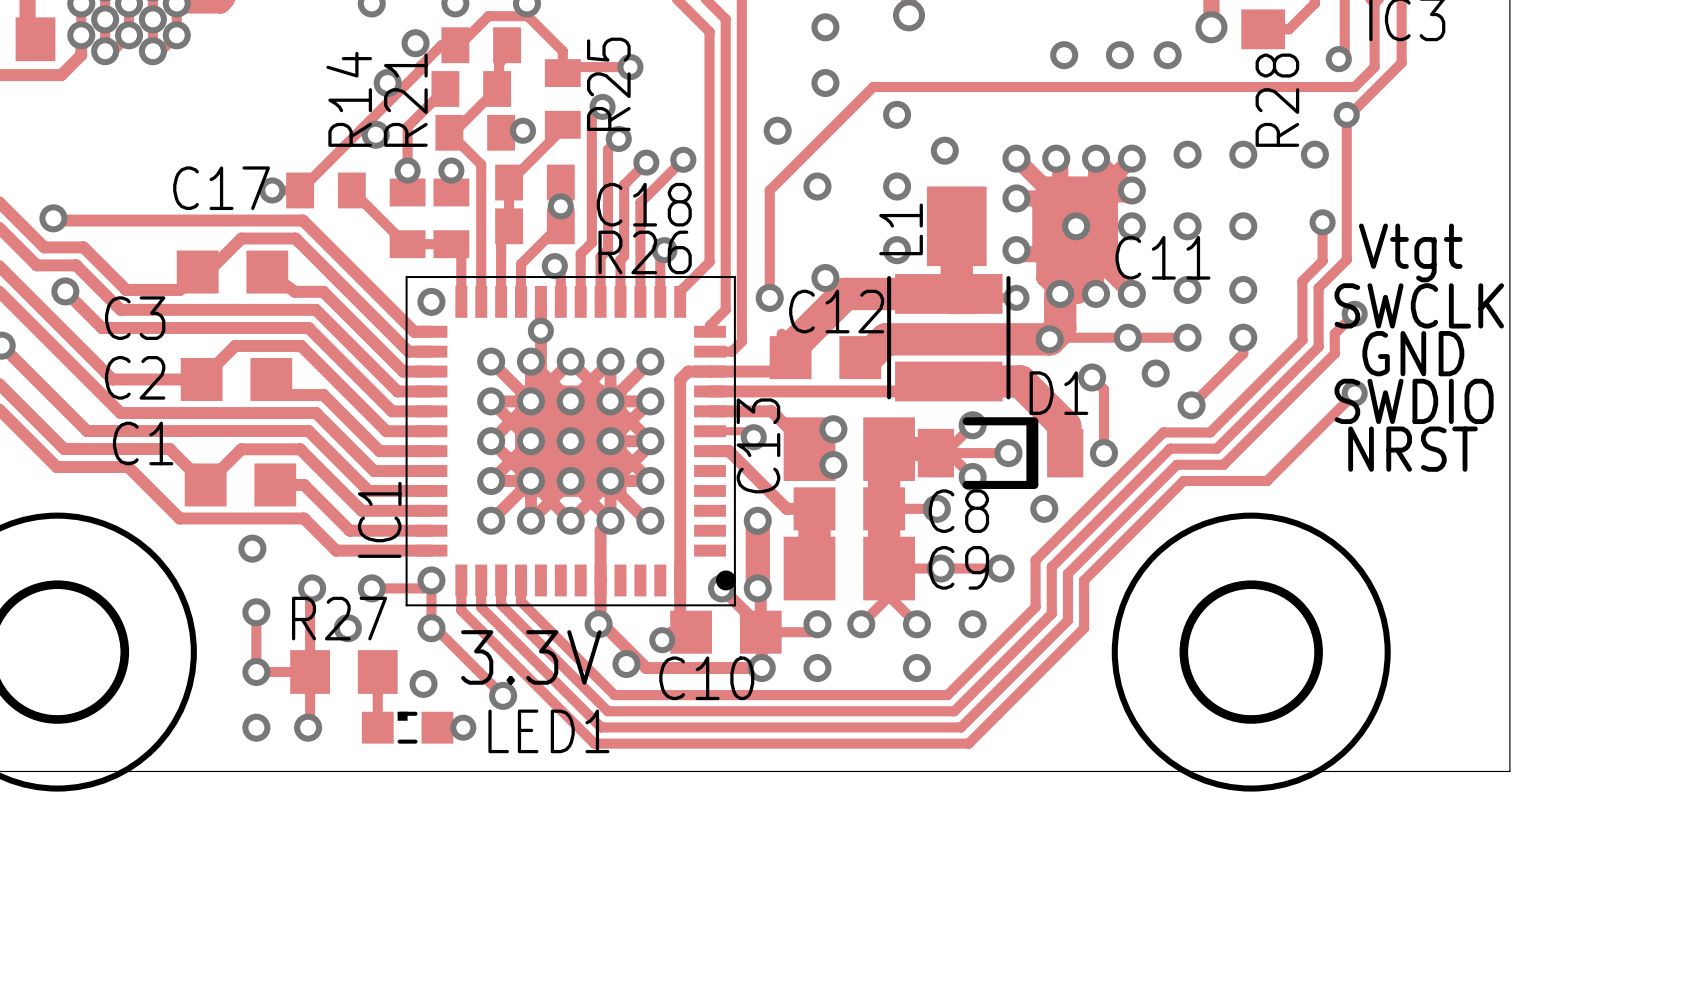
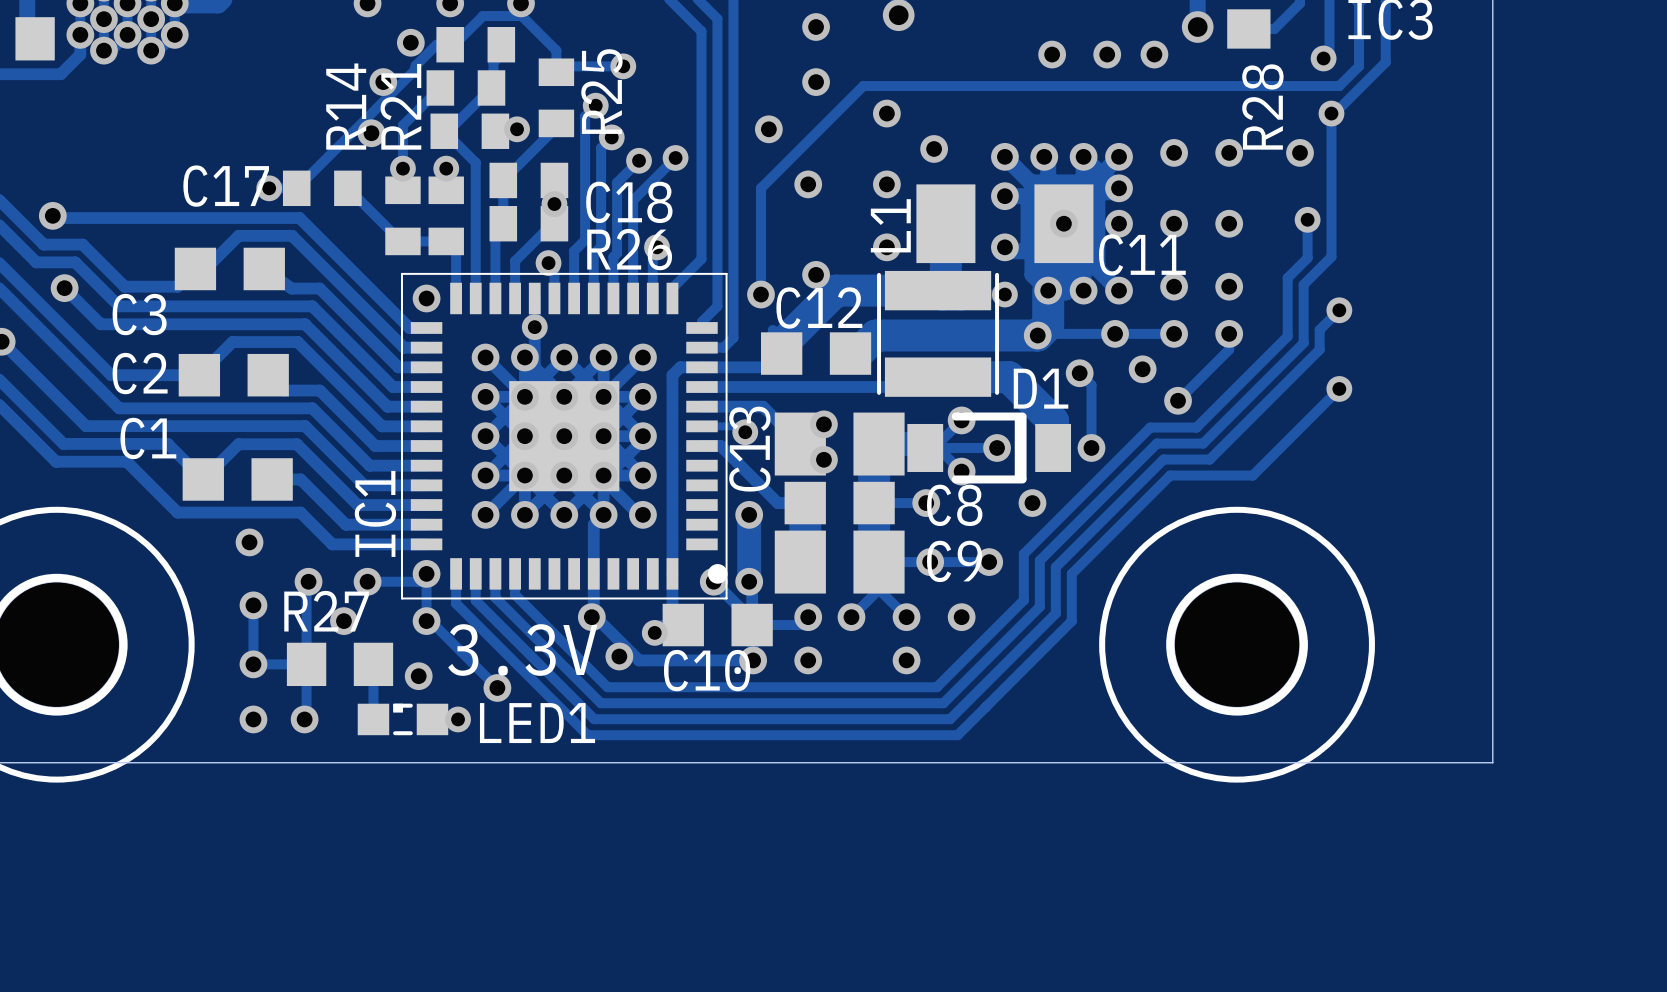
text: Vtgt (1410, 252) -> none
text: SWCLK (1419, 305) -> none
text: GND (1413, 353) -> none
text: SWDIO (1414, 401) -> none
text: NRST (1413, 449) -> none

